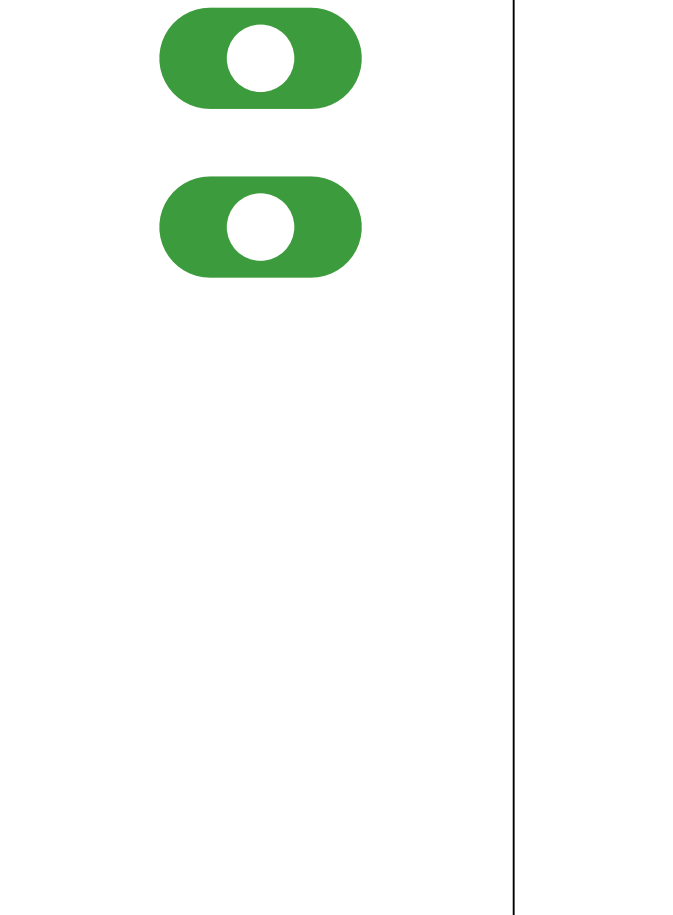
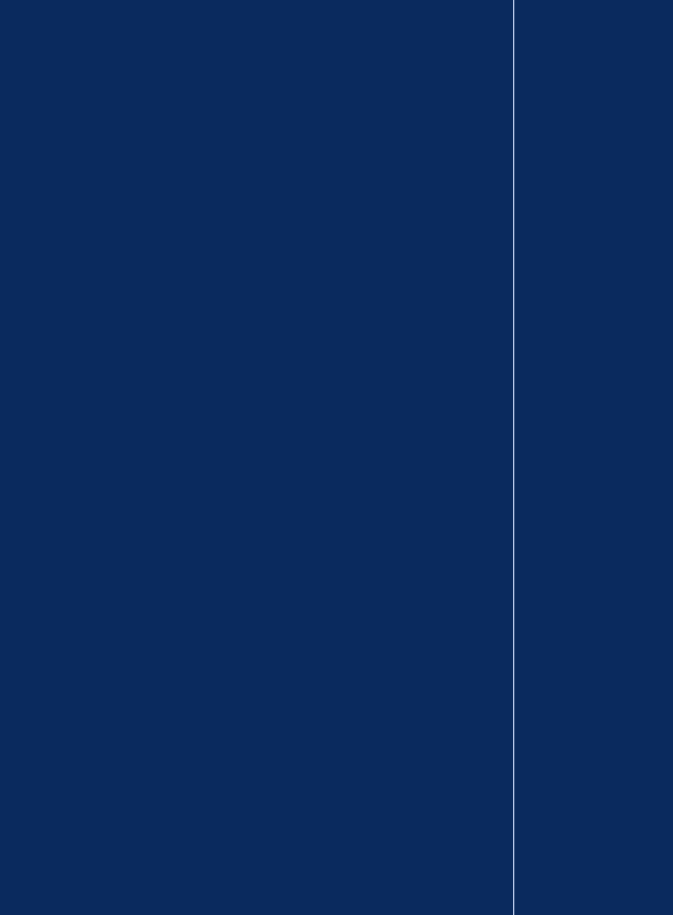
part: (260, 142) -> none

